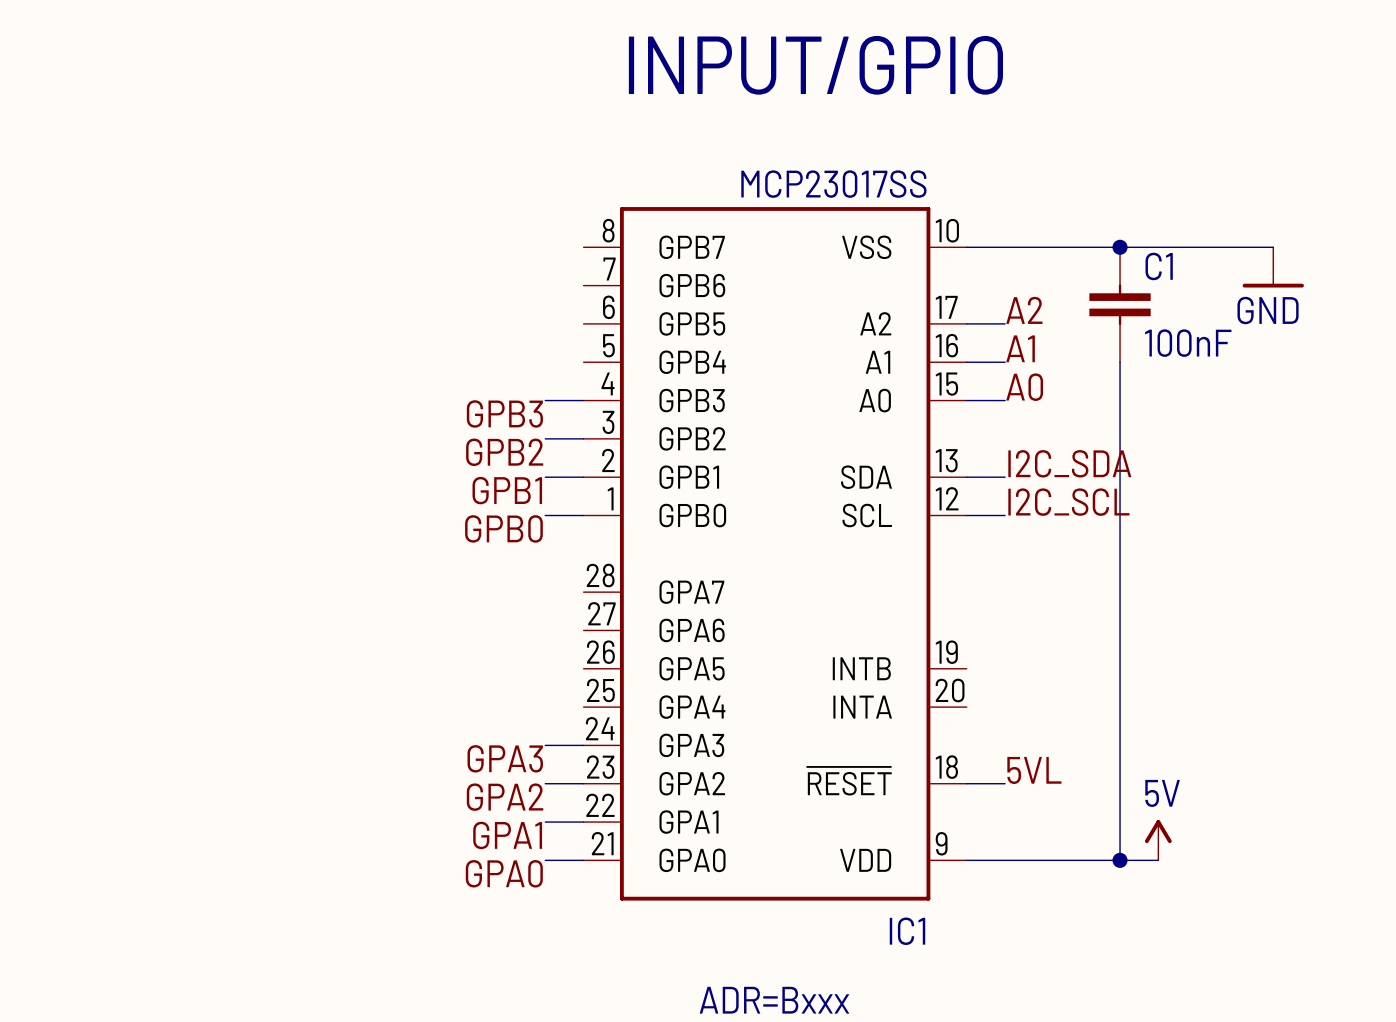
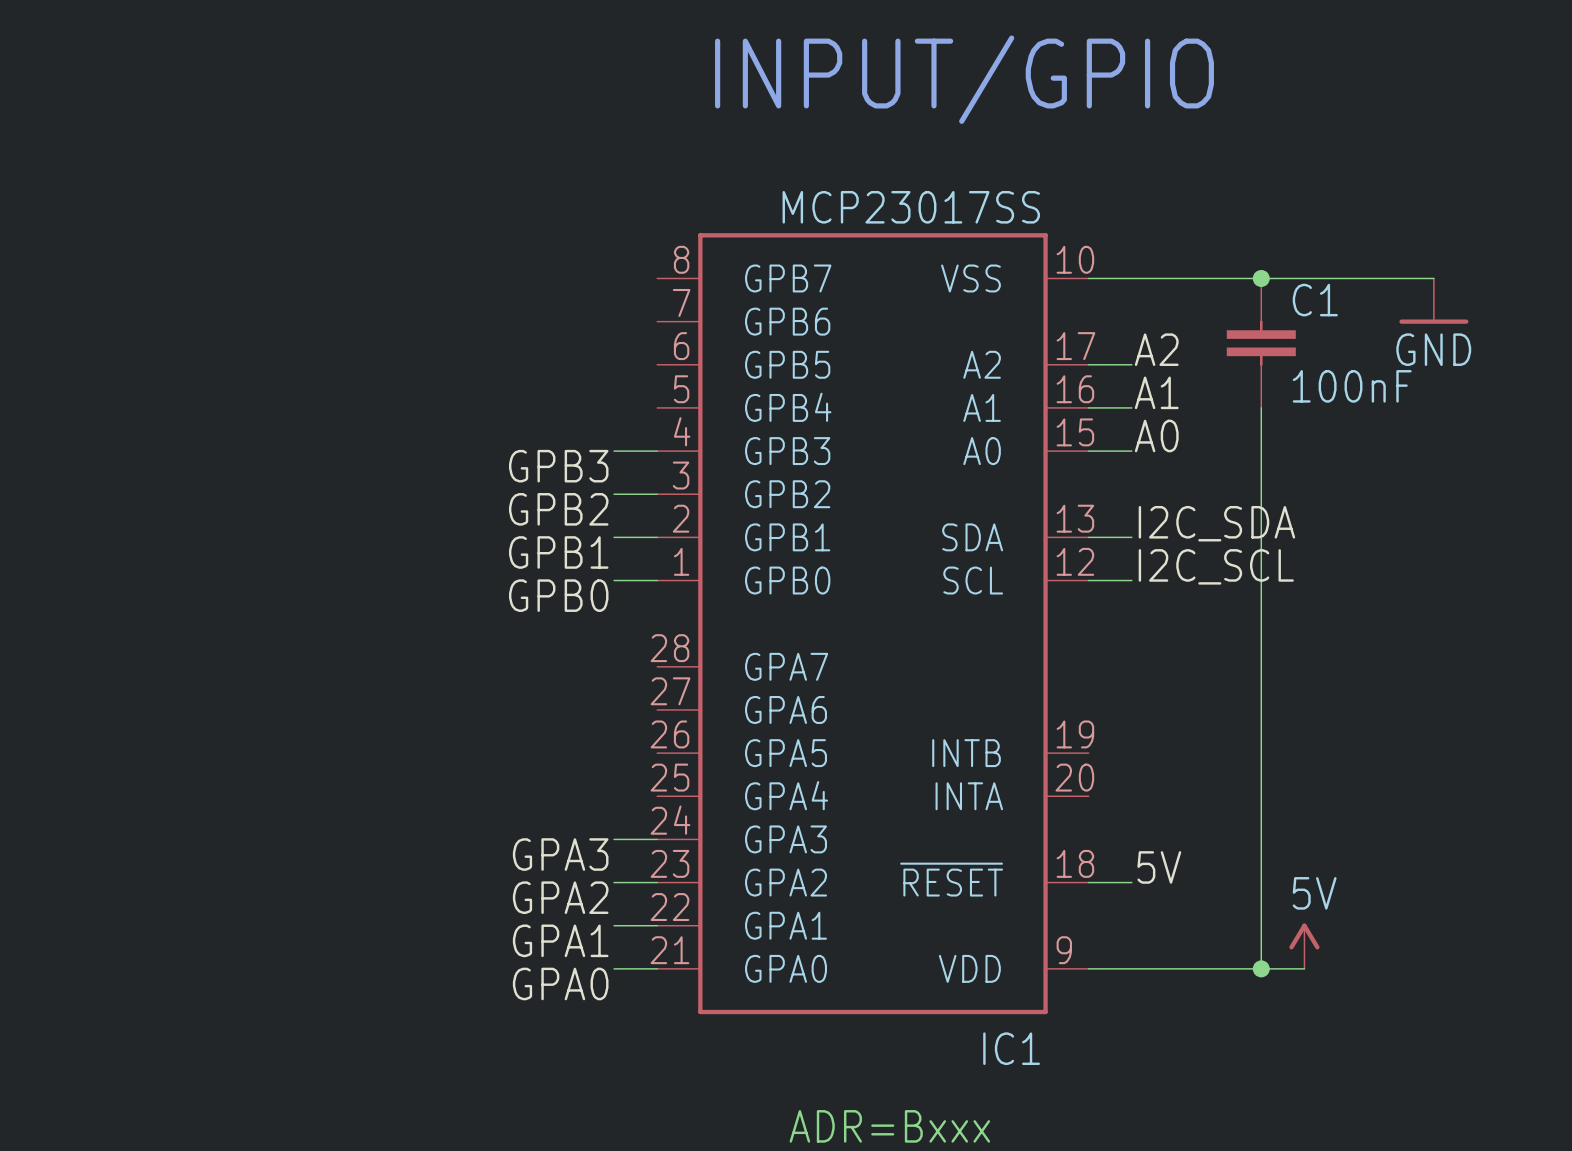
label: 5VL (1034, 770) -> 5V (1159, 867)

